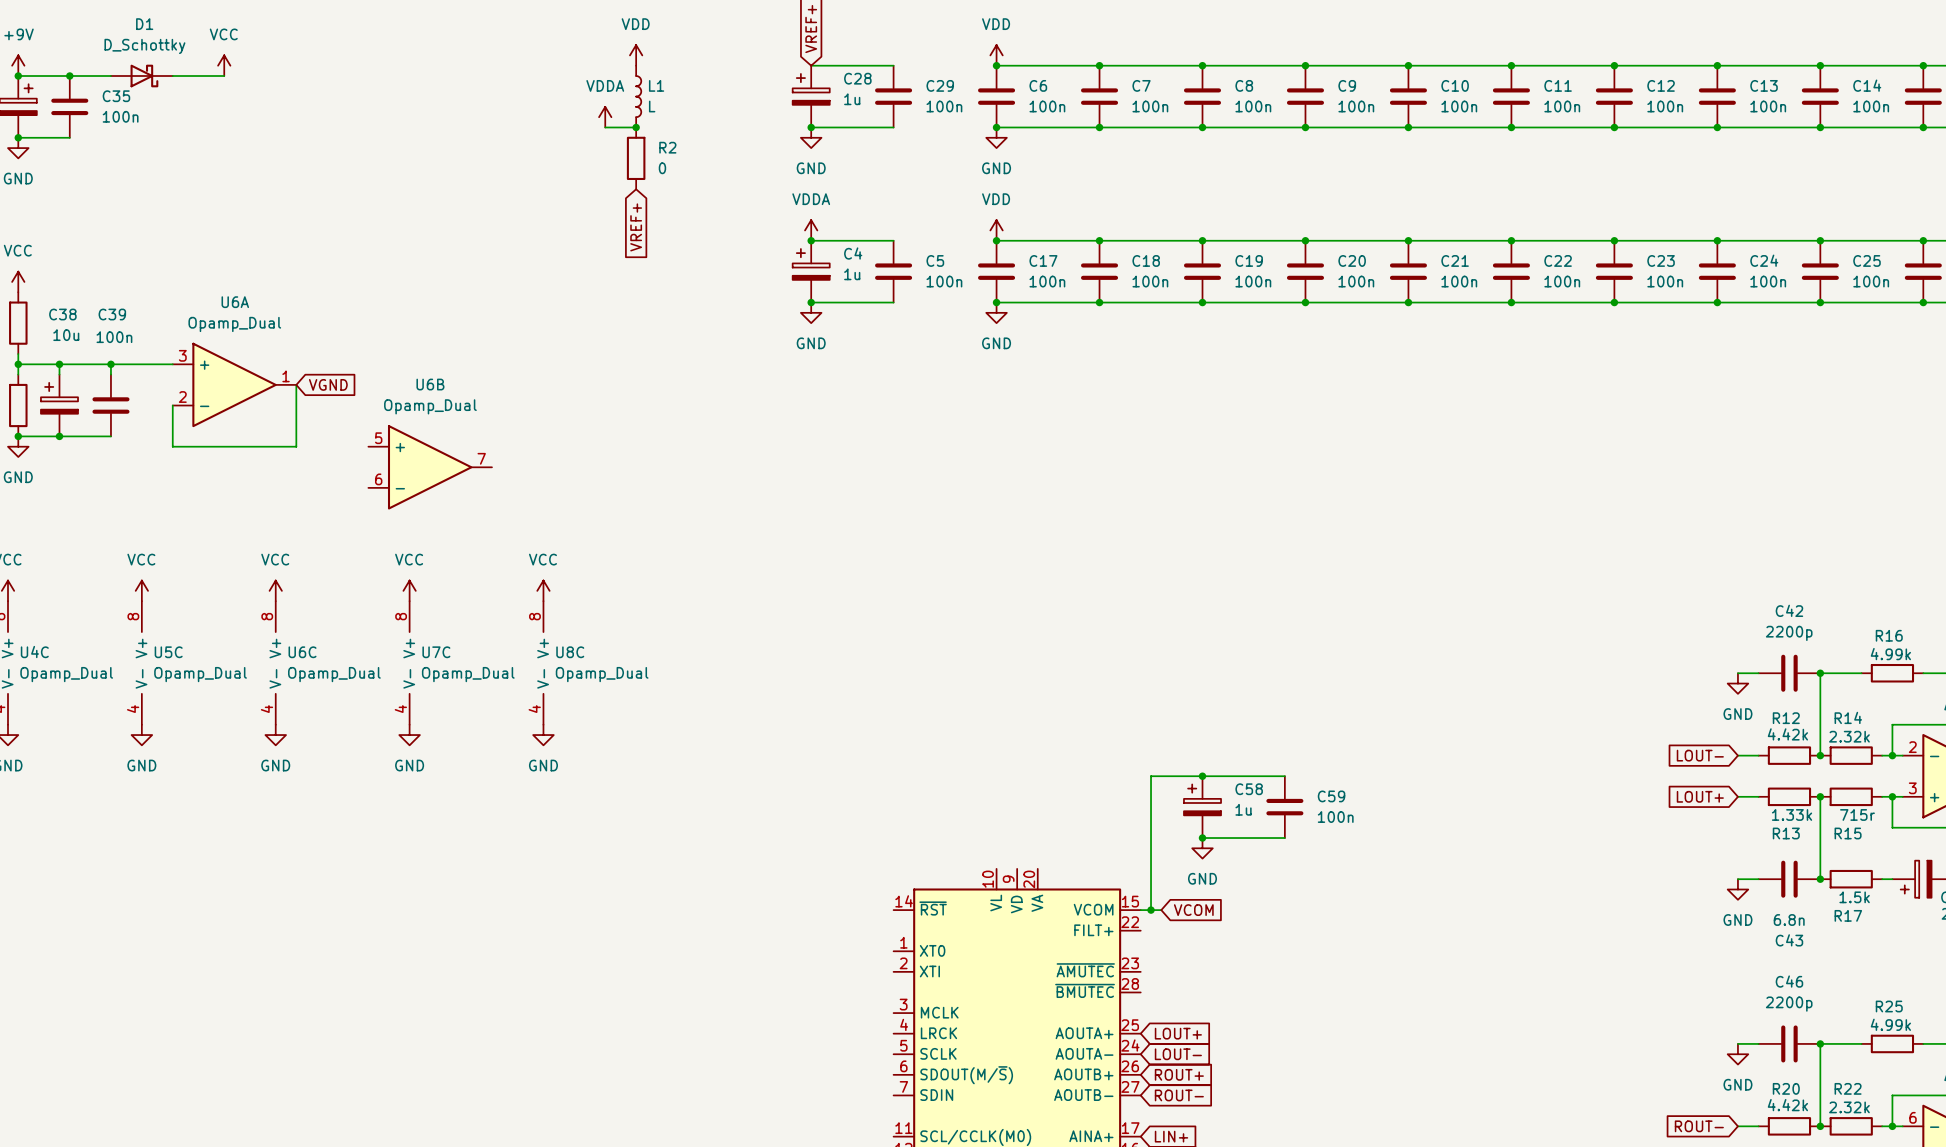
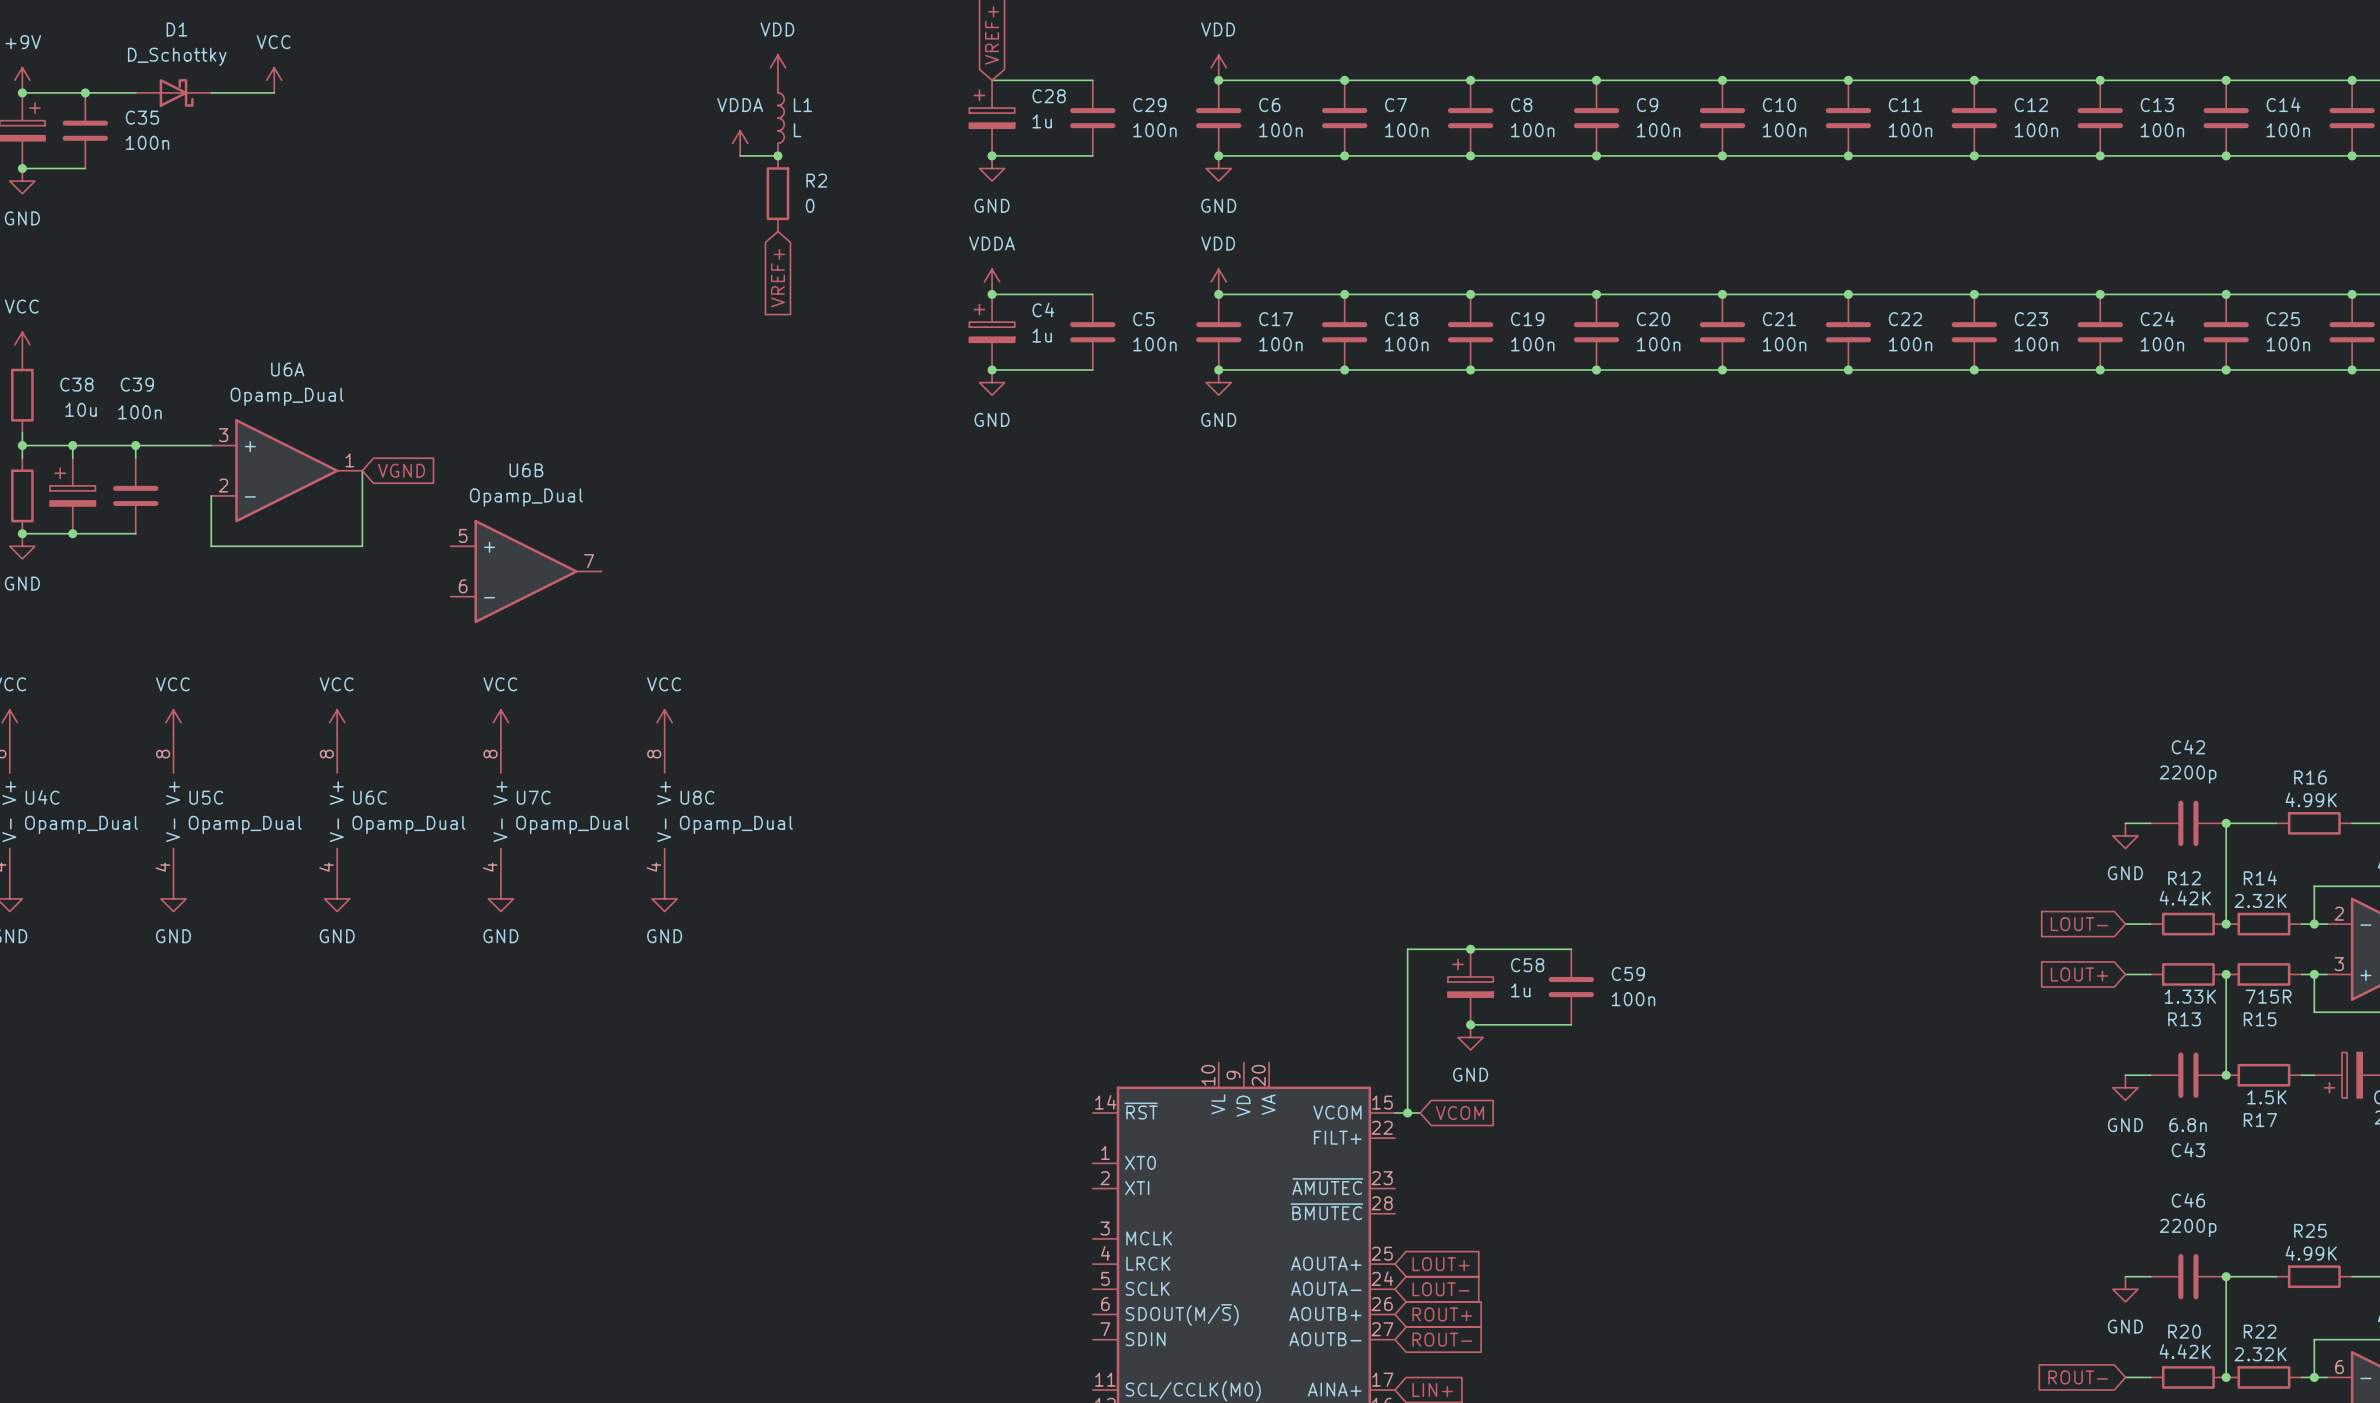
R16 value: 4.99k (1890, 654) -> 4.99K (2311, 799)
R12 value: 4.42k (1787, 734) -> 4.42K (2185, 898)
R14 value: 2.32k (1849, 736) -> 2.32K (2260, 900)
R13 value: 1.33k (1792, 814) -> 1.33K (2190, 996)
R15 value: 715r (1857, 814) -> 715R (2268, 996)
R17 value: 1.5k (1854, 897) -> 1.5K (2266, 1097)
R25 value: 4.99k (1890, 1024) -> 4.99K (2311, 1253)
R20 value: 4.42k (1787, 1105) -> 4.42K (2185, 1351)
R22 value: 2.32k (1849, 1107) -> 2.32K (2260, 1354)

